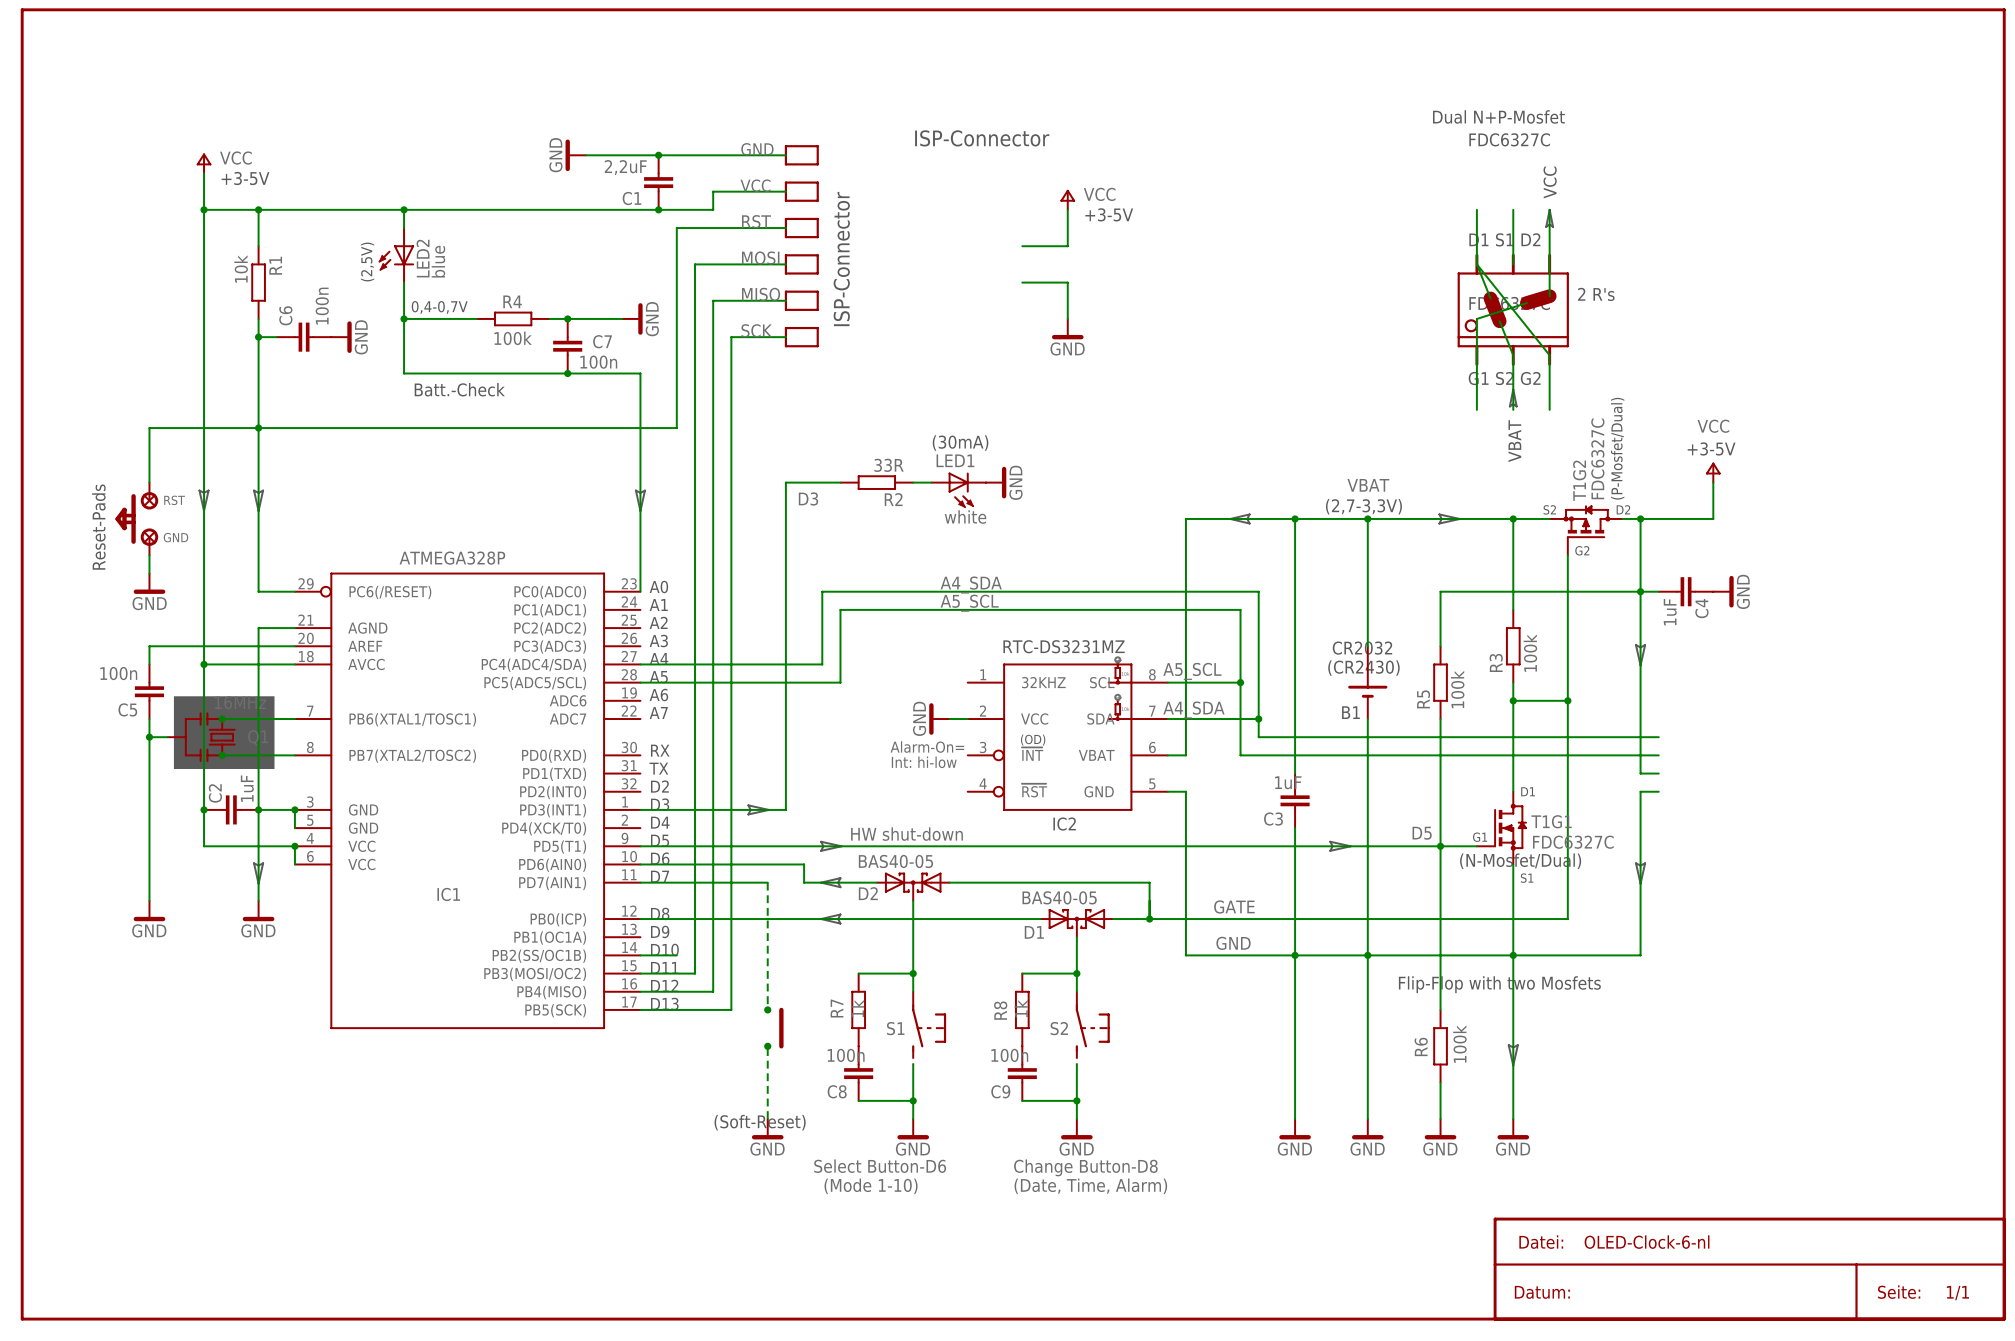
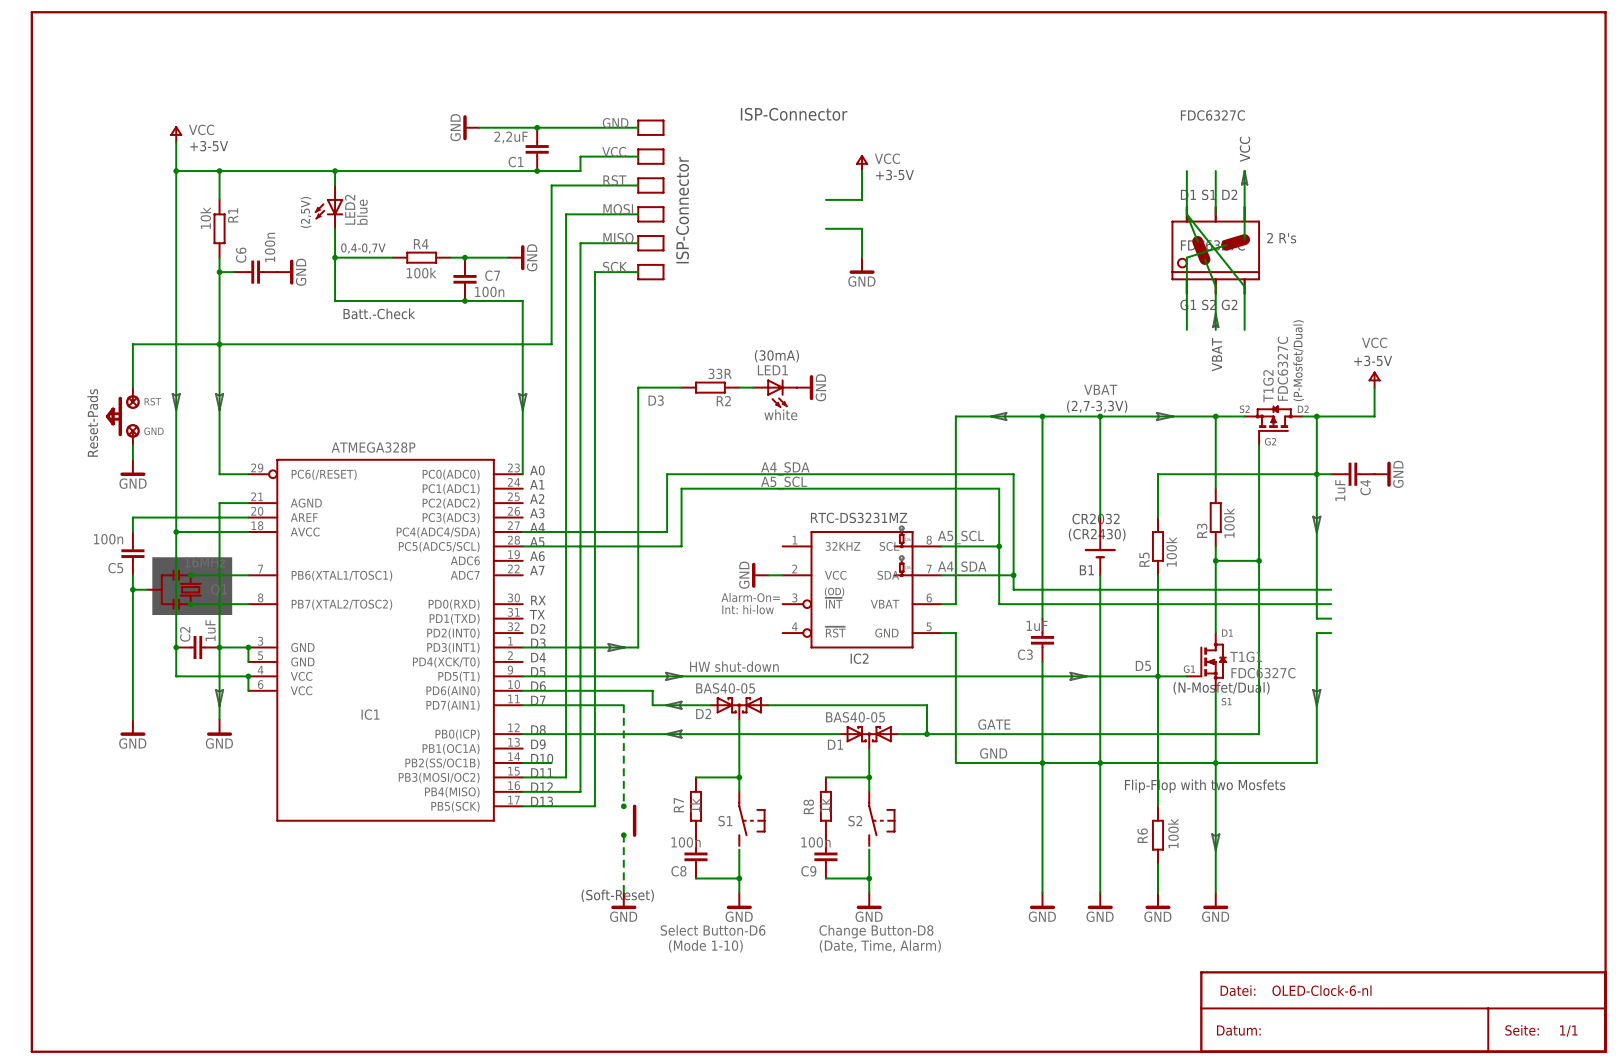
text: Dual N+P-Mosfet (1498, 116) -> none

